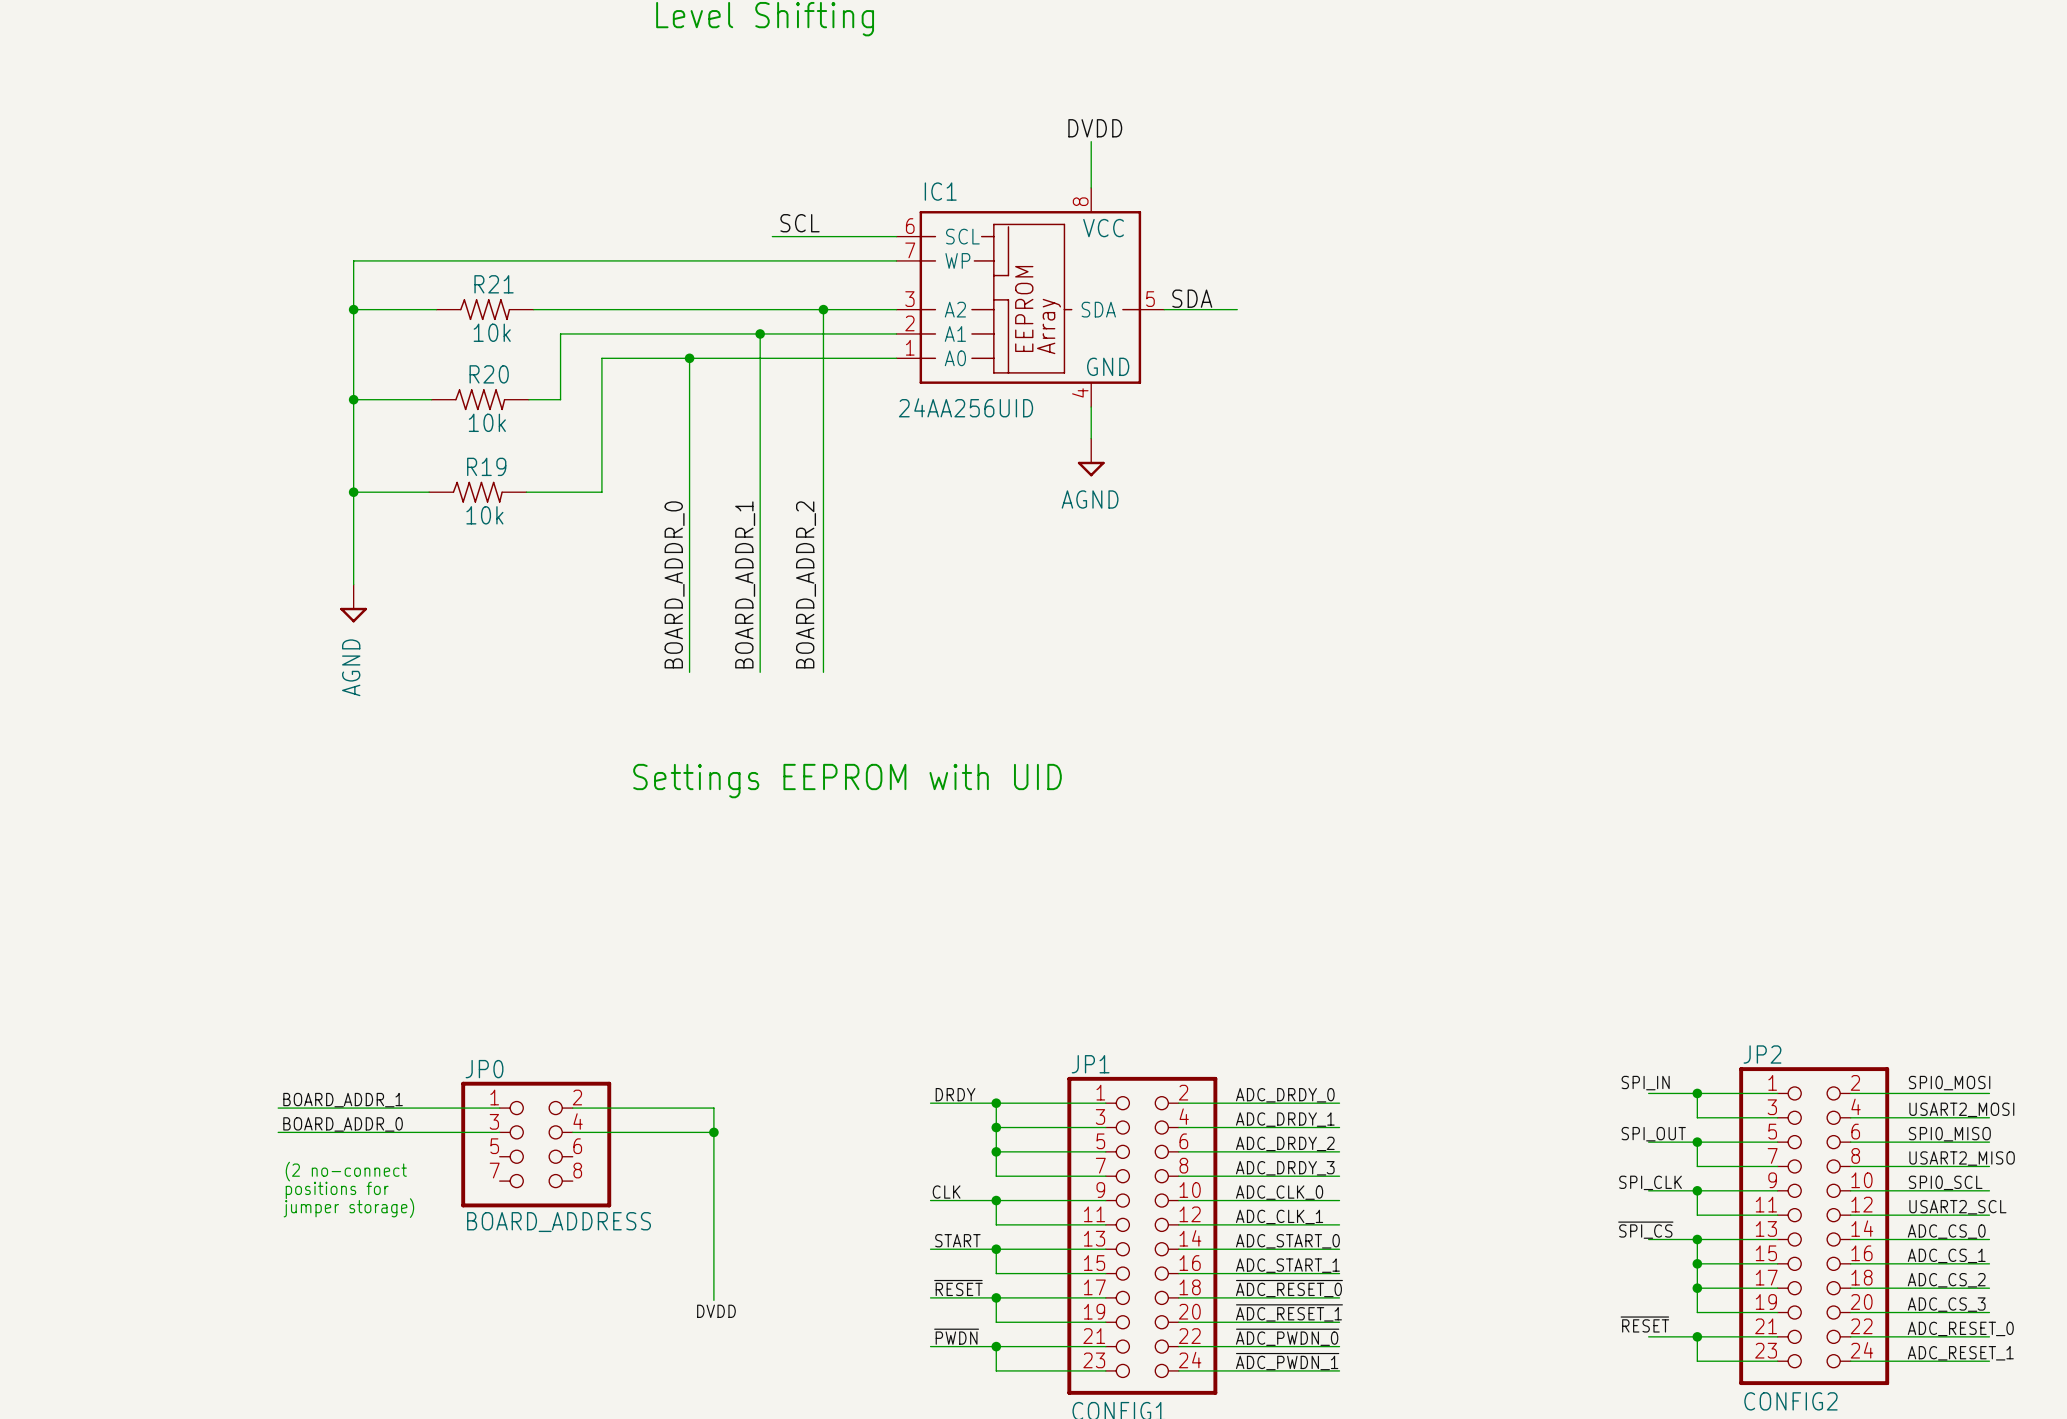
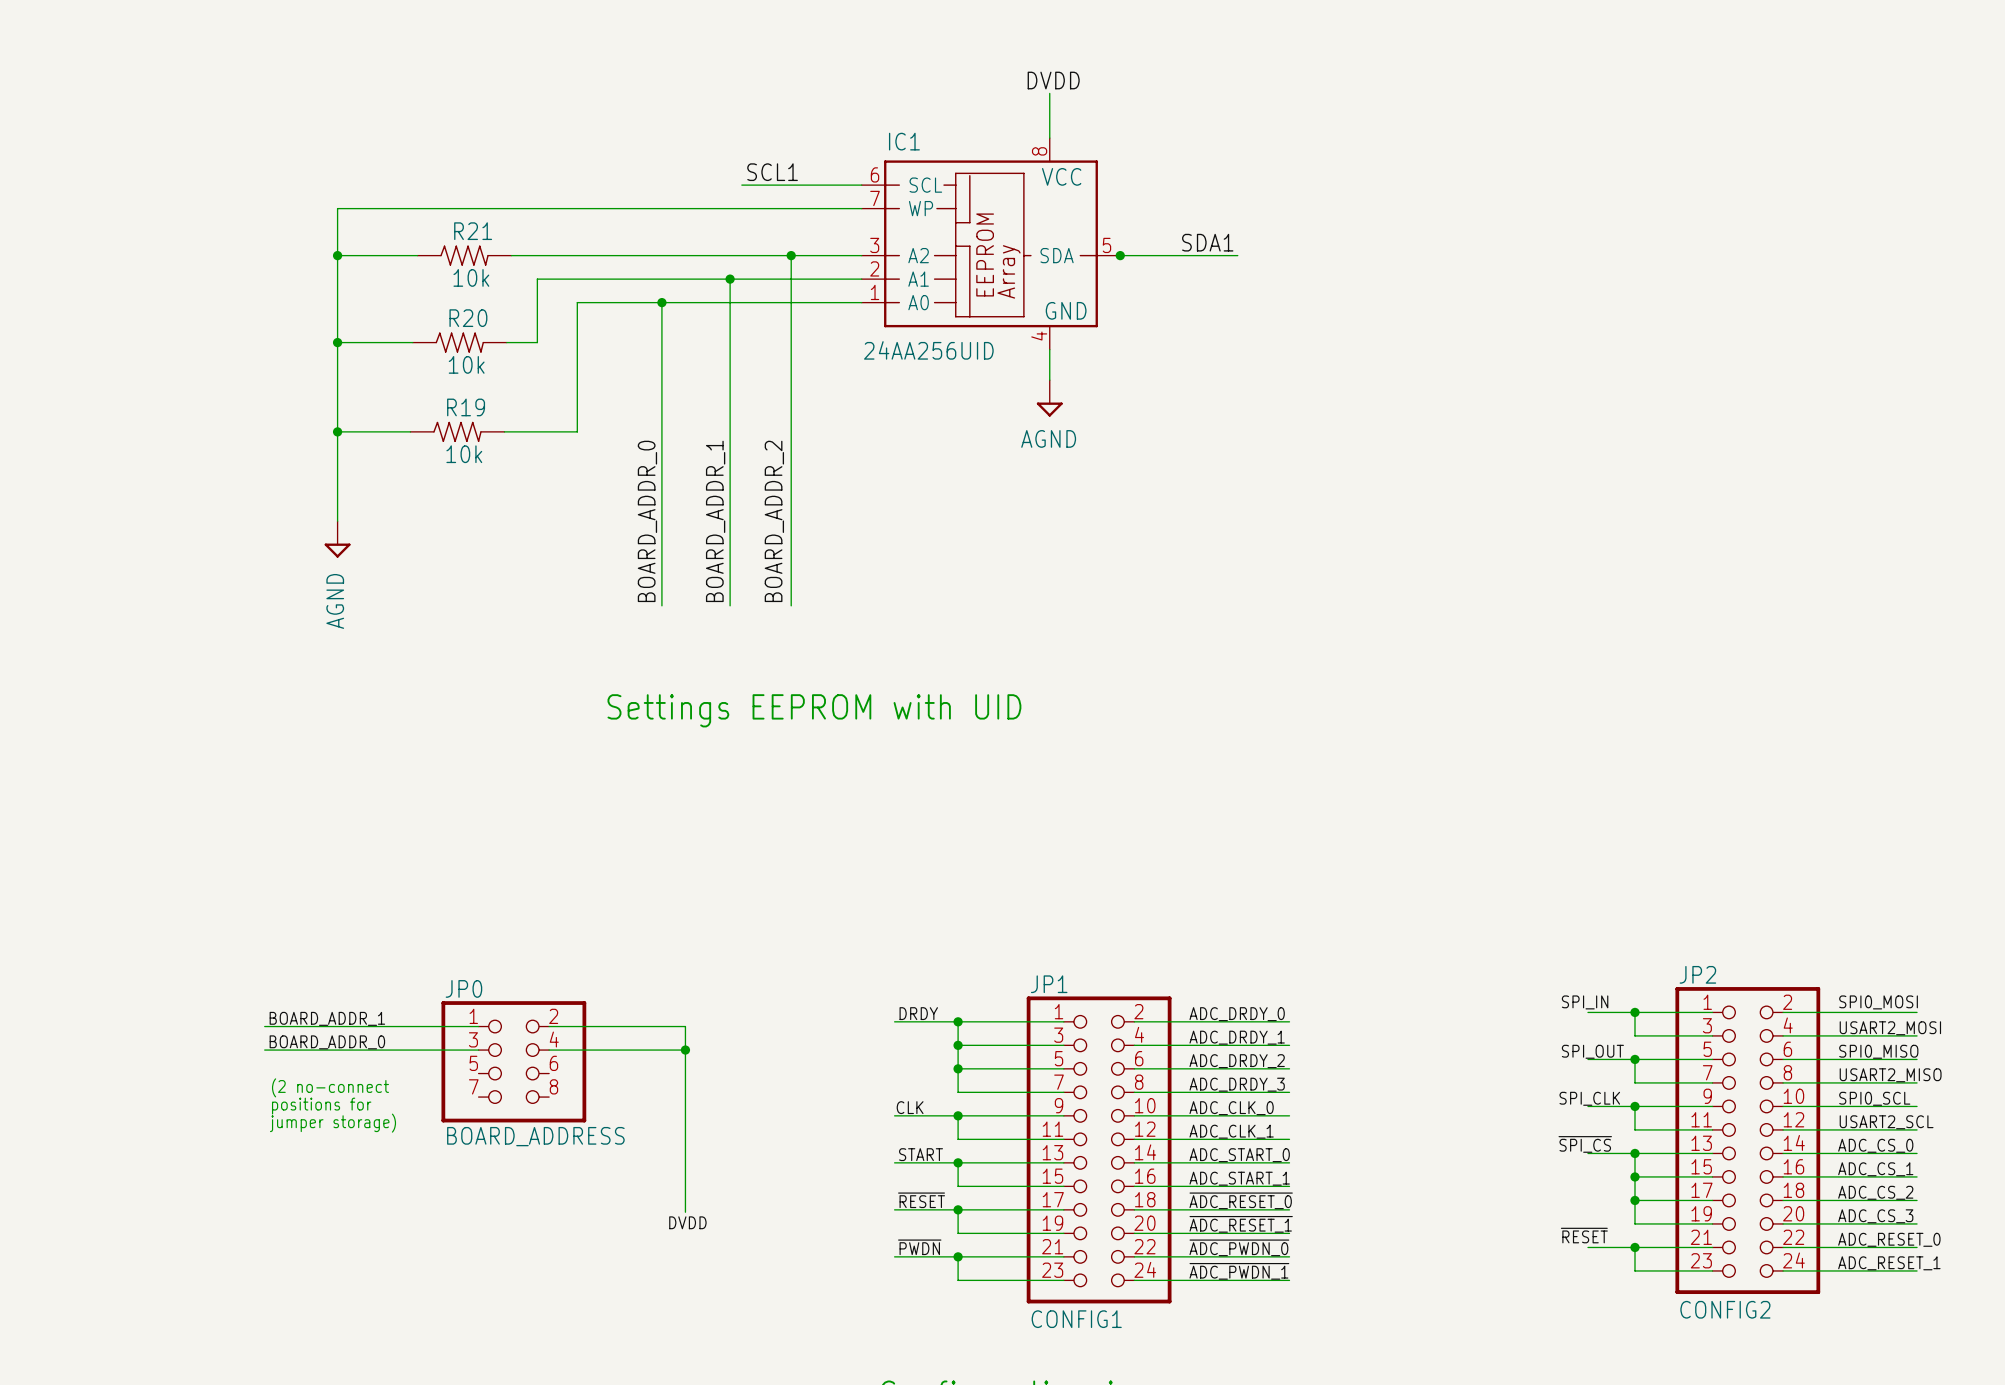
label: SCL (800, 223) -> SCL1 (772, 172)
label: none -> SDA1 (1207, 242)
label: SDA (1192, 298) -> none
junction: none -> (1120, 255)
wire: none -> (1190, 255) (1237, 255)

